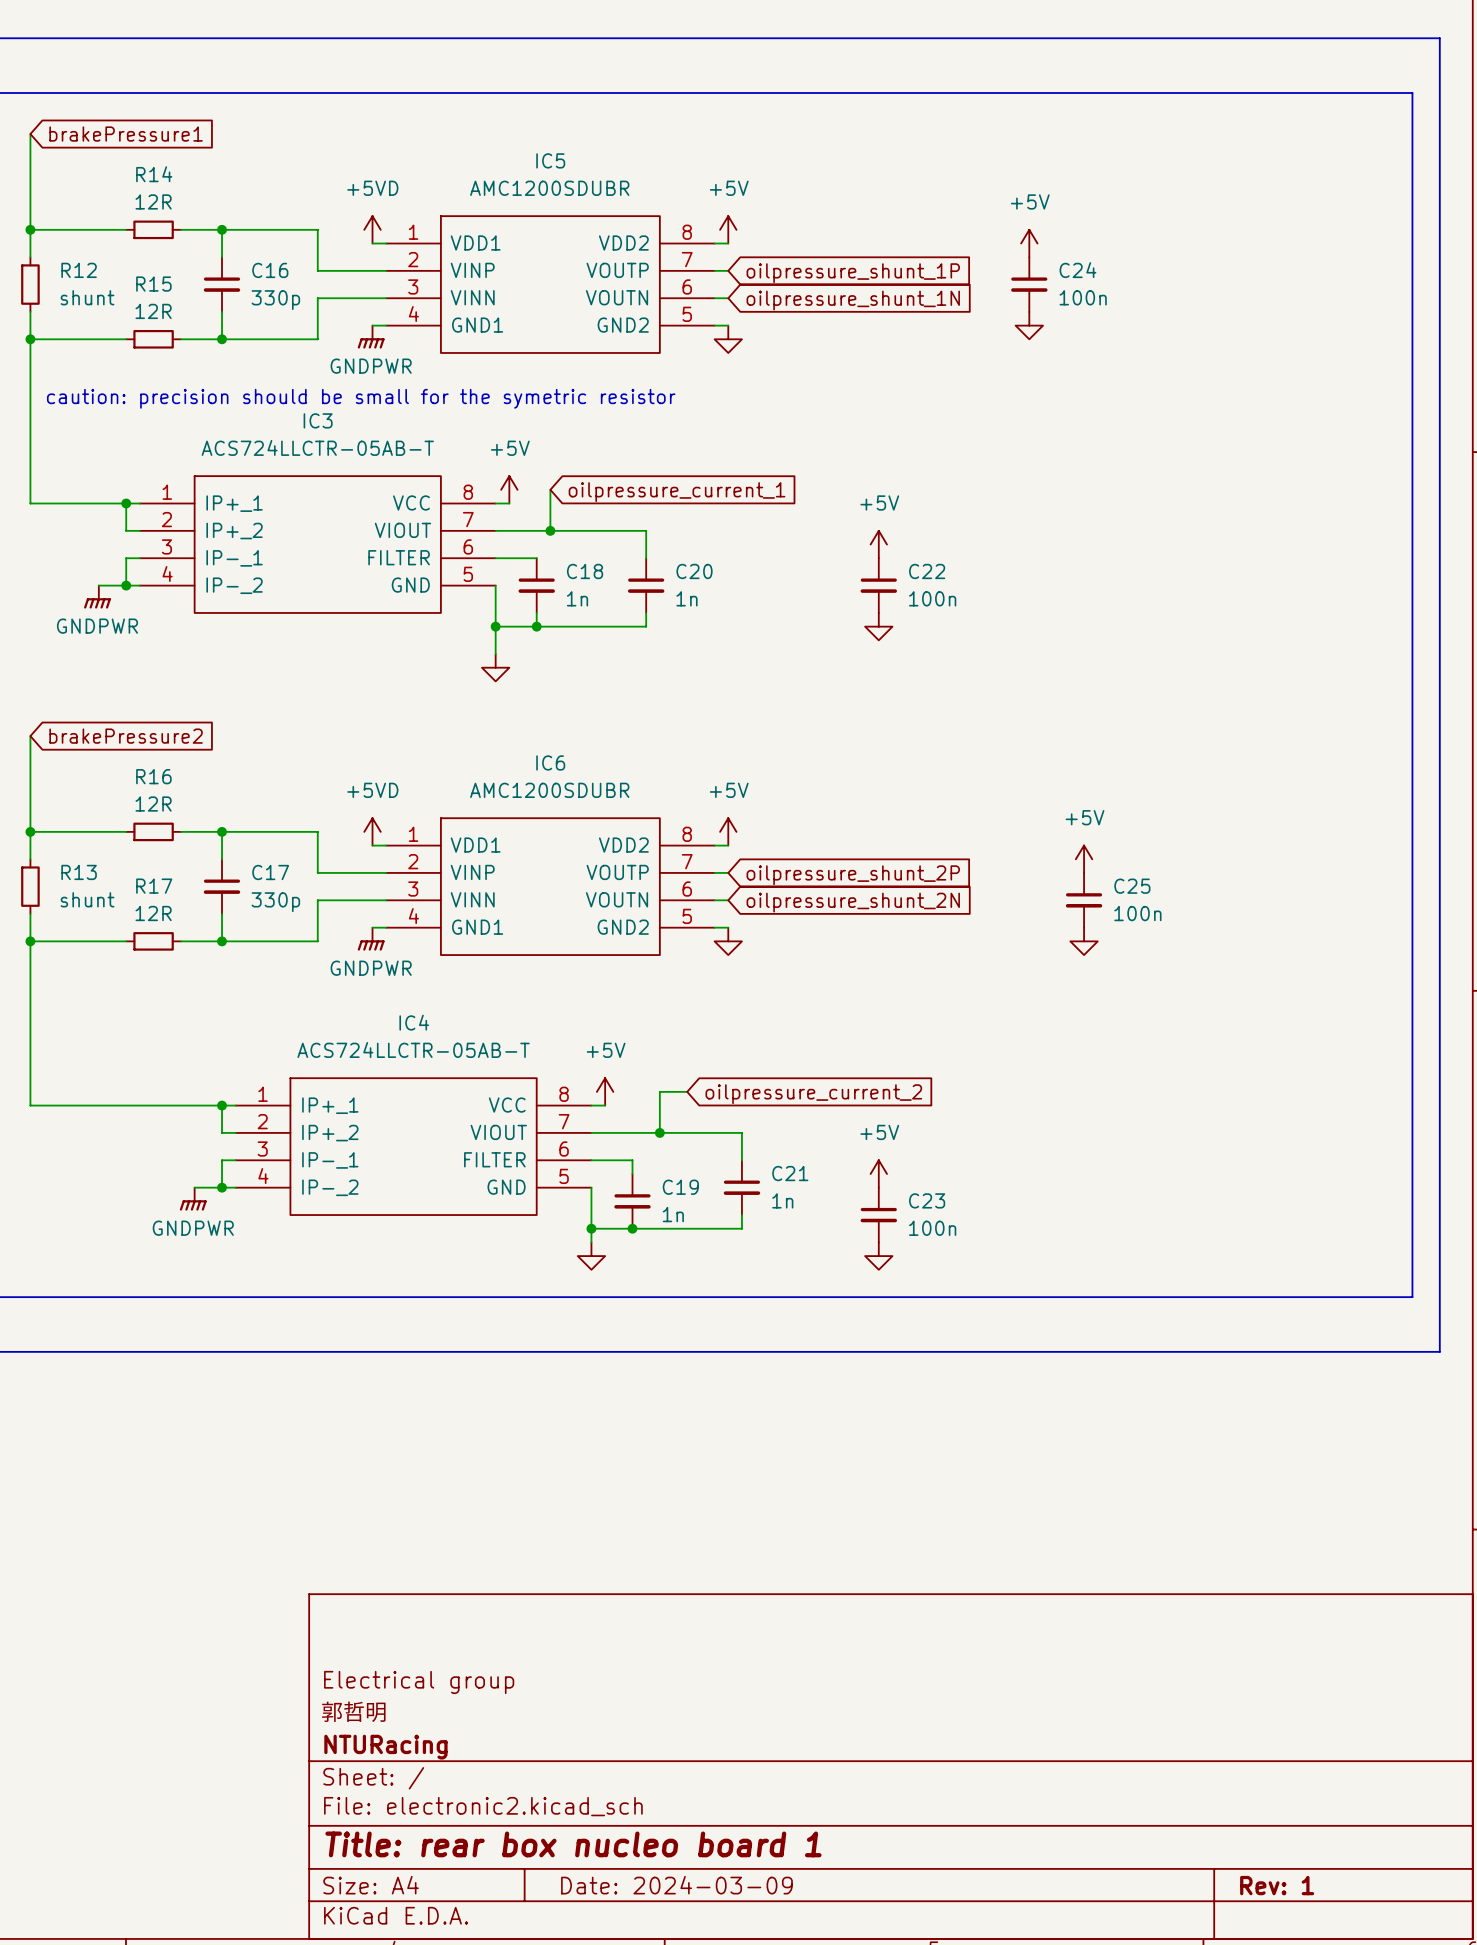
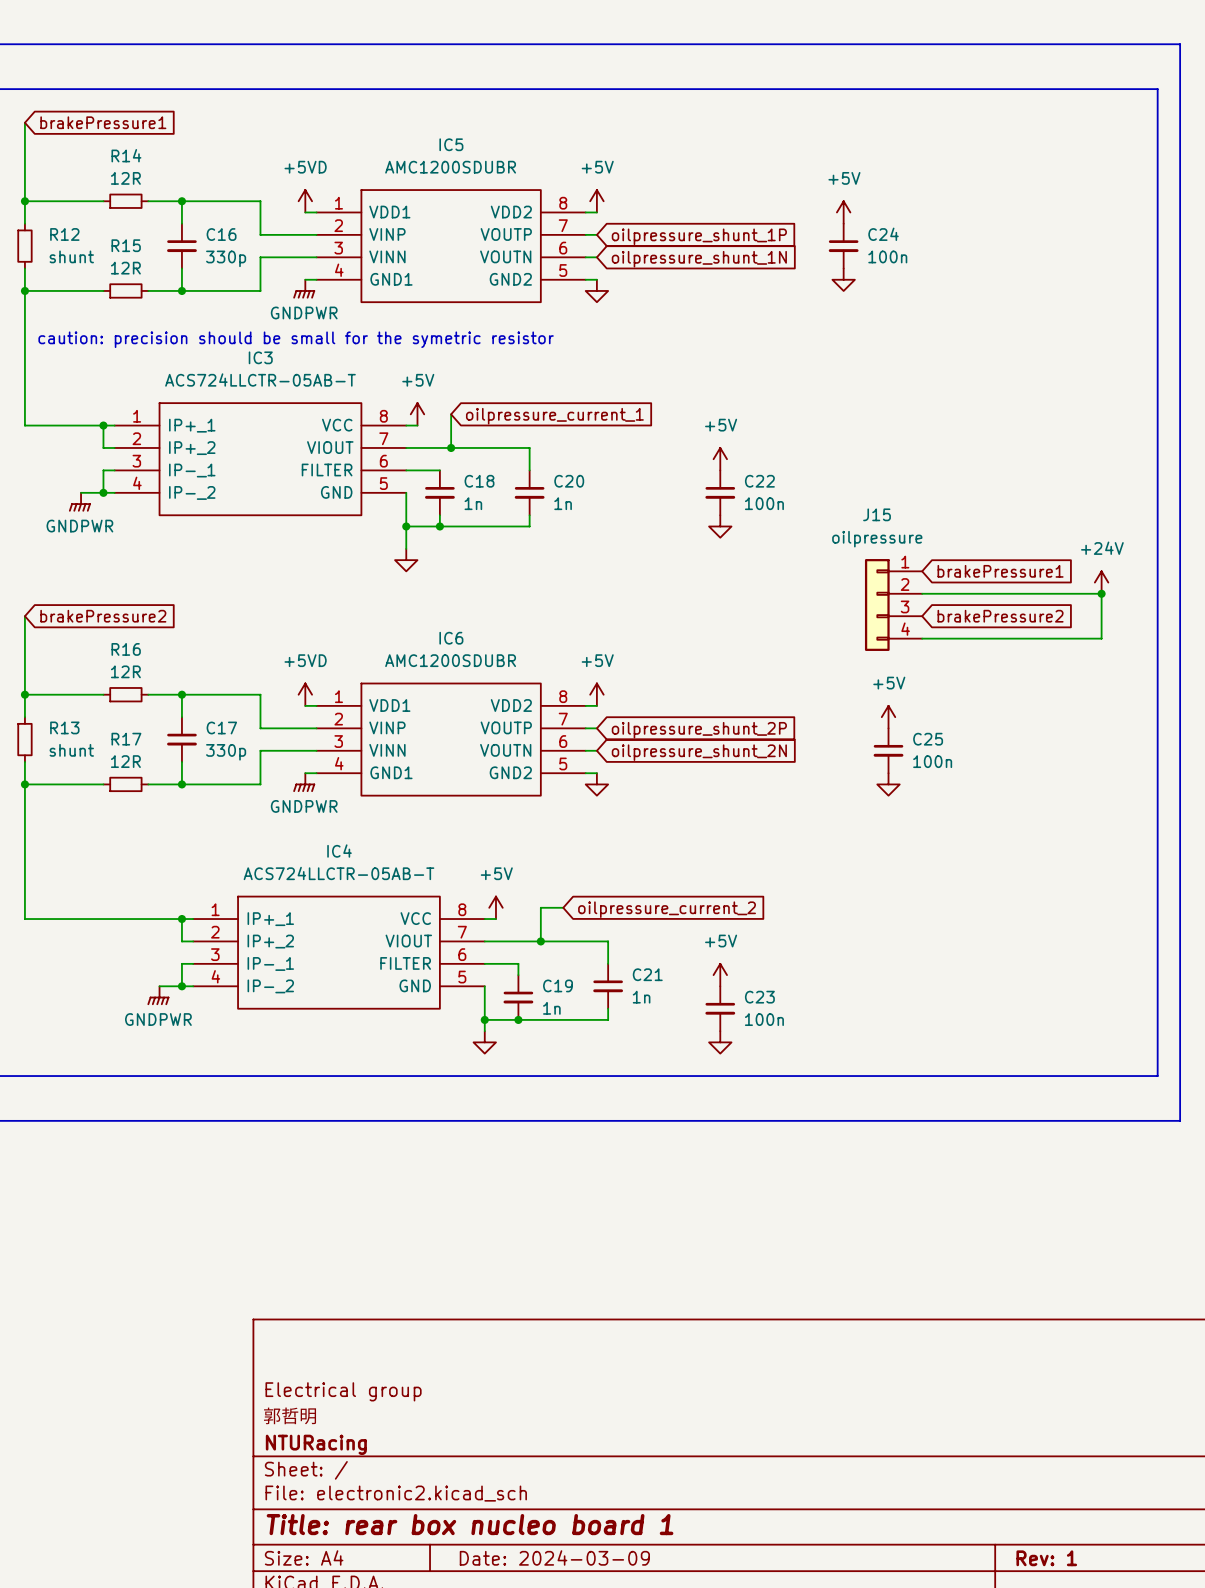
global label: none -> brakePressure1 (1000, 571)
power symbol: none -> +24V (1101, 582)
wire: none -> (922, 593) (1101, 593) (1101, 638) (922, 638)
junction: none -> (1101, 593)
J15: none -> oilpressure (893, 604)
global label: none -> brakePressure2 (1000, 616)

